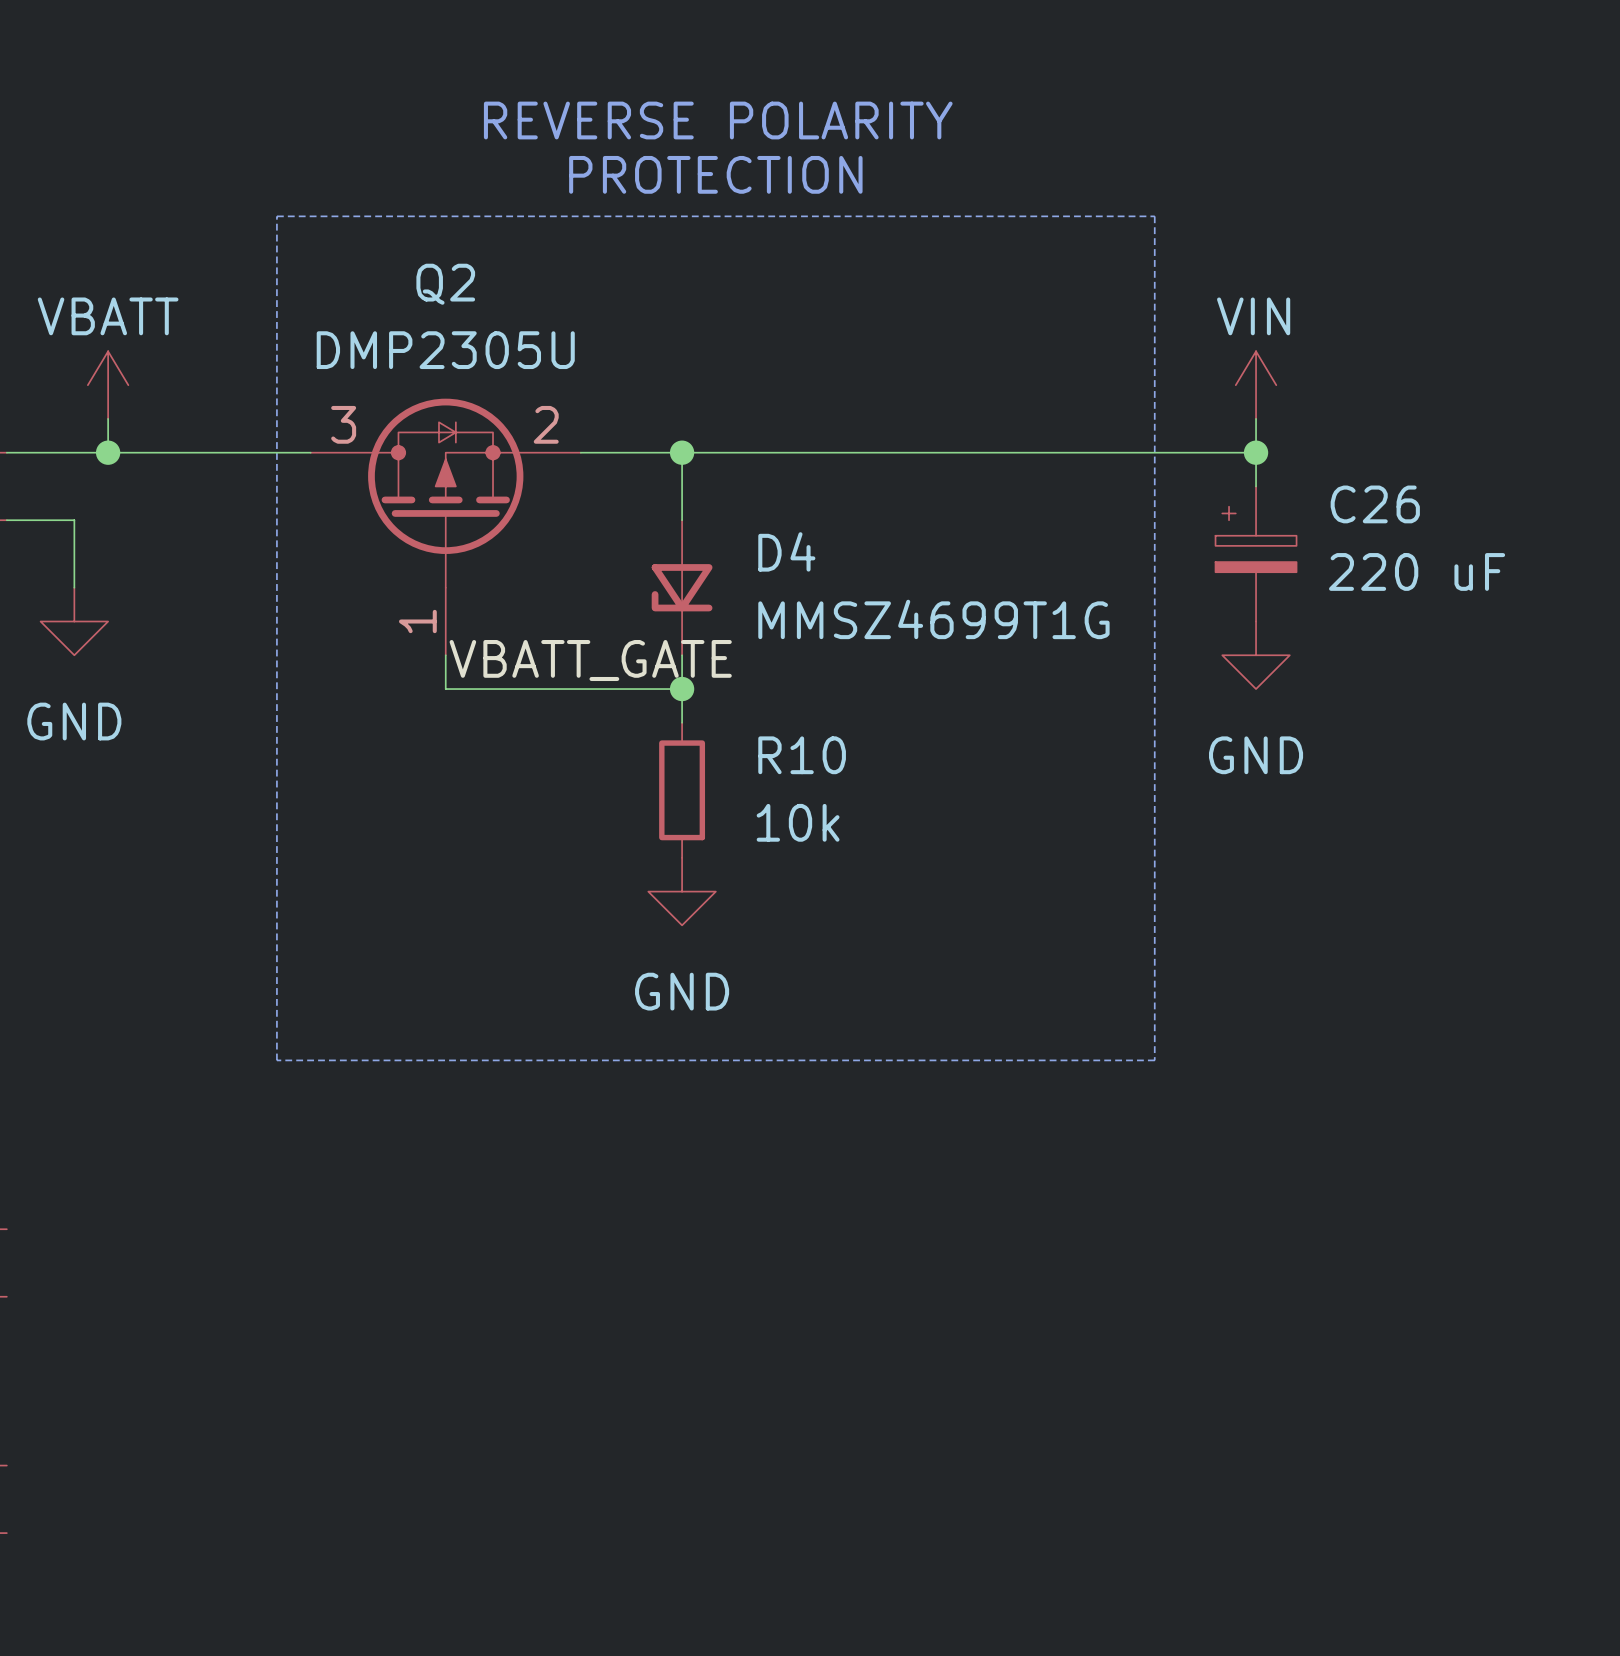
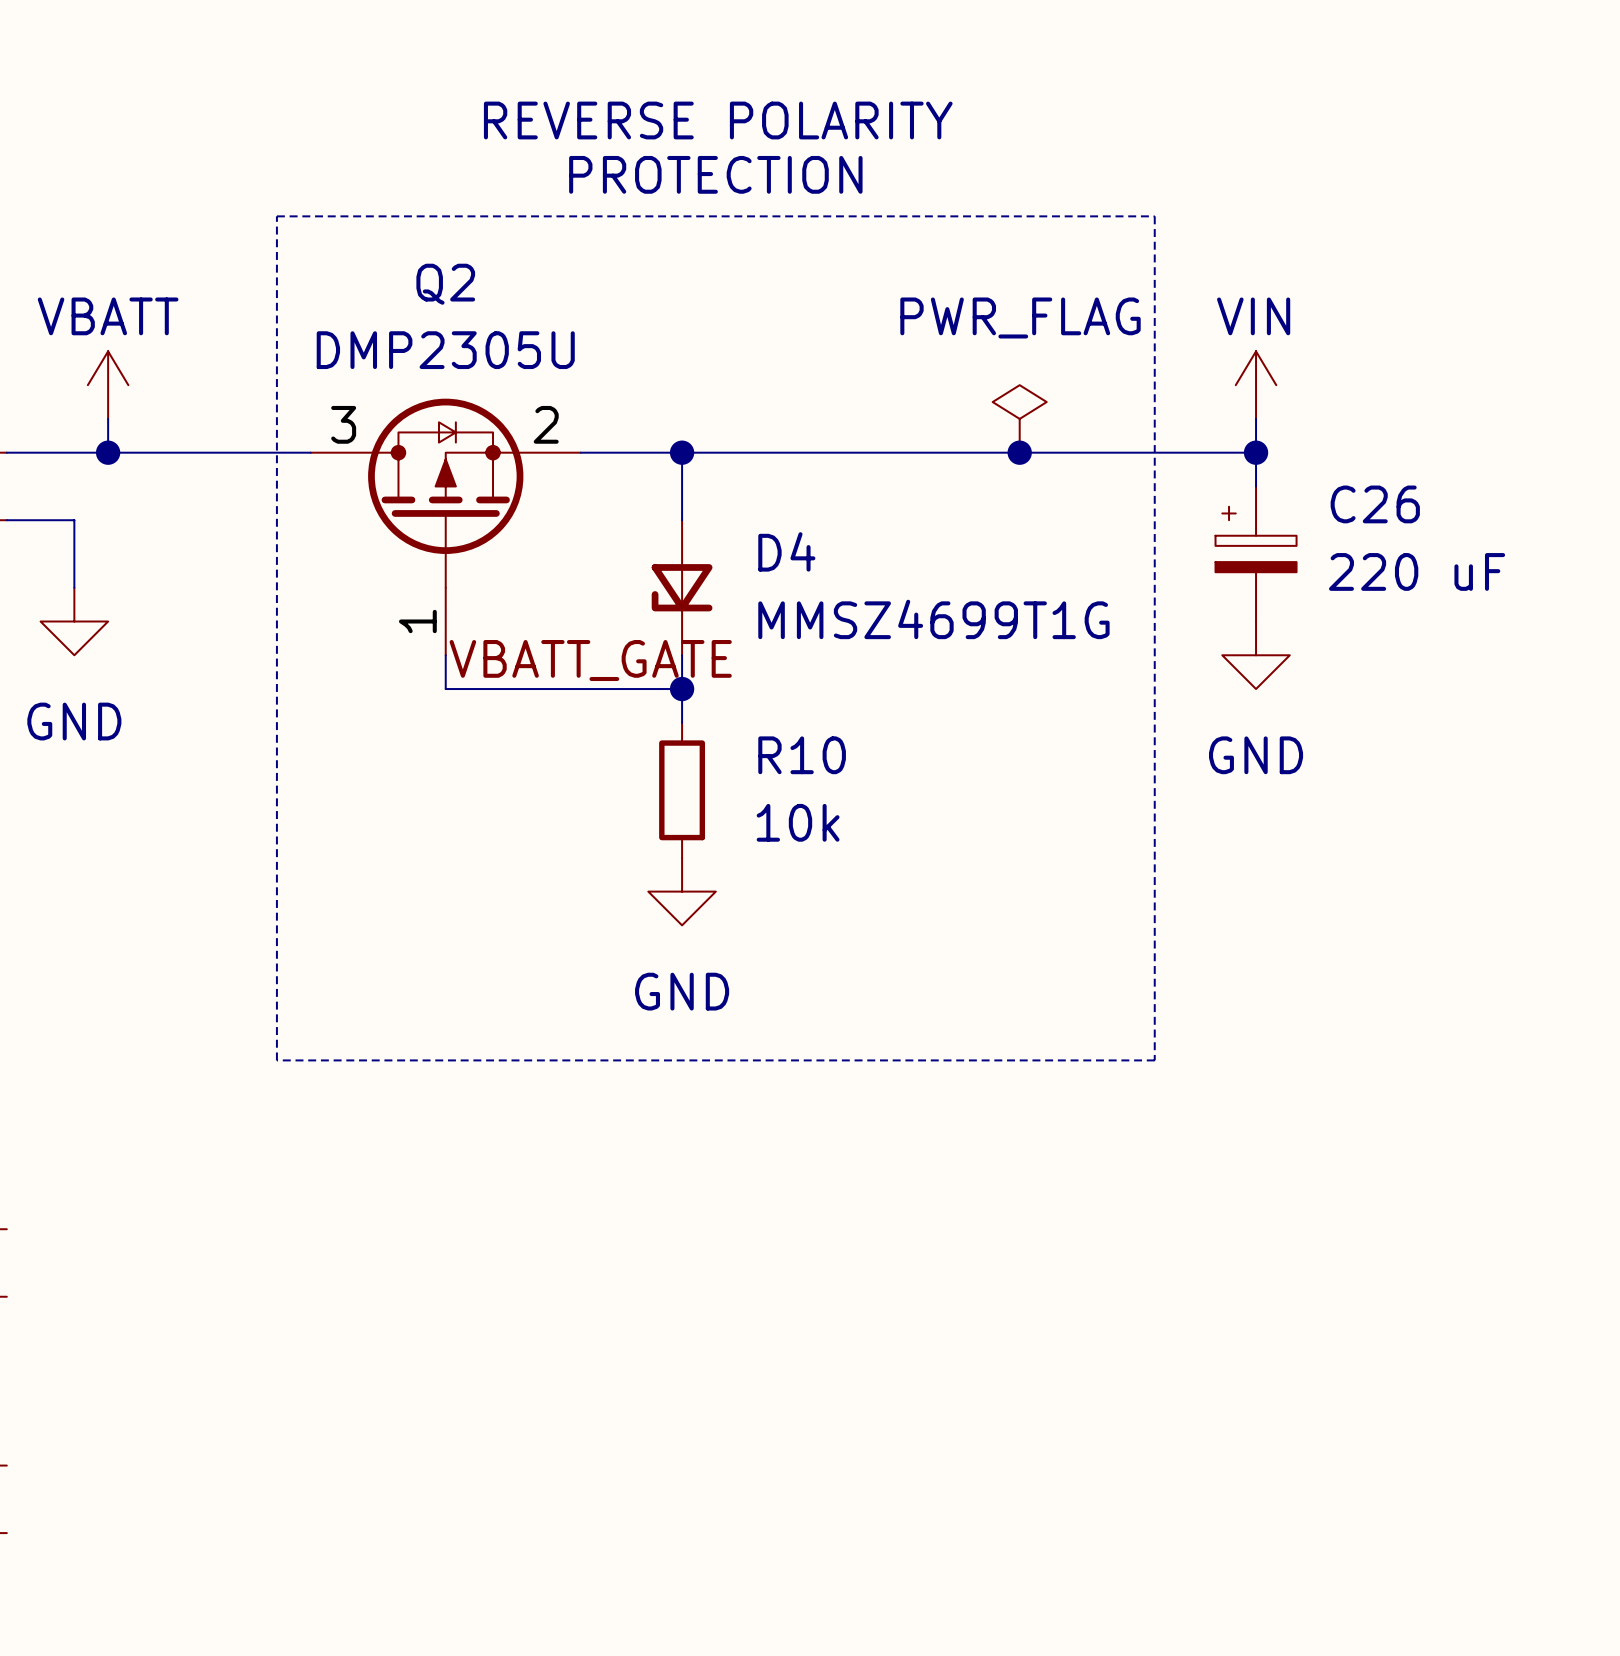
power symbol: none -> PWR_FLAG (1019, 418)
junction: none -> (1019, 452)

